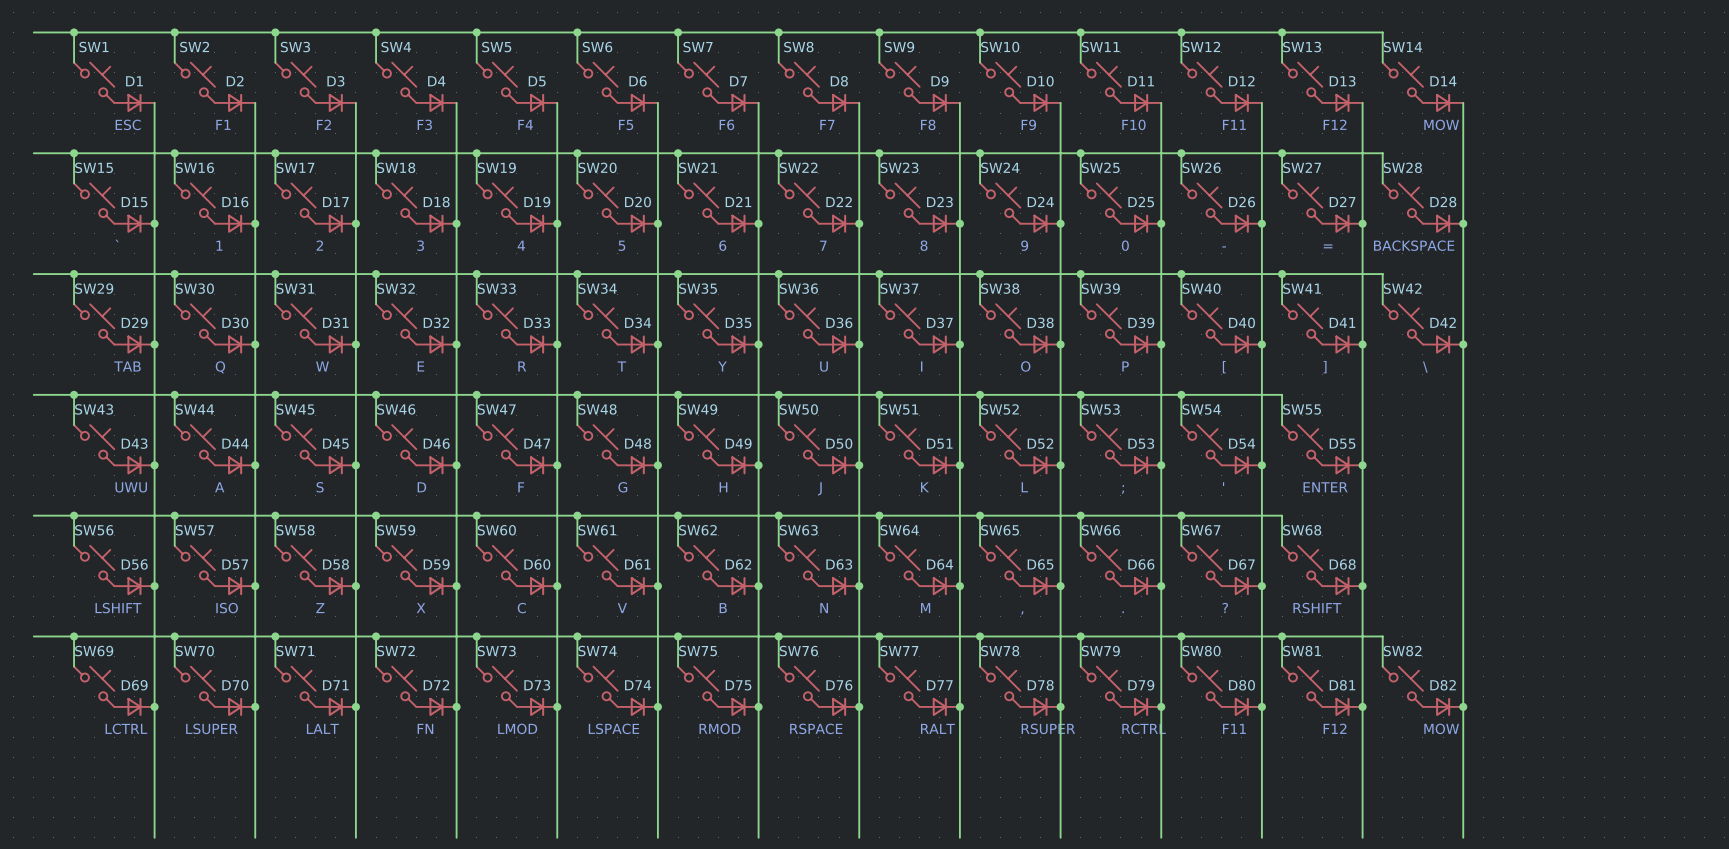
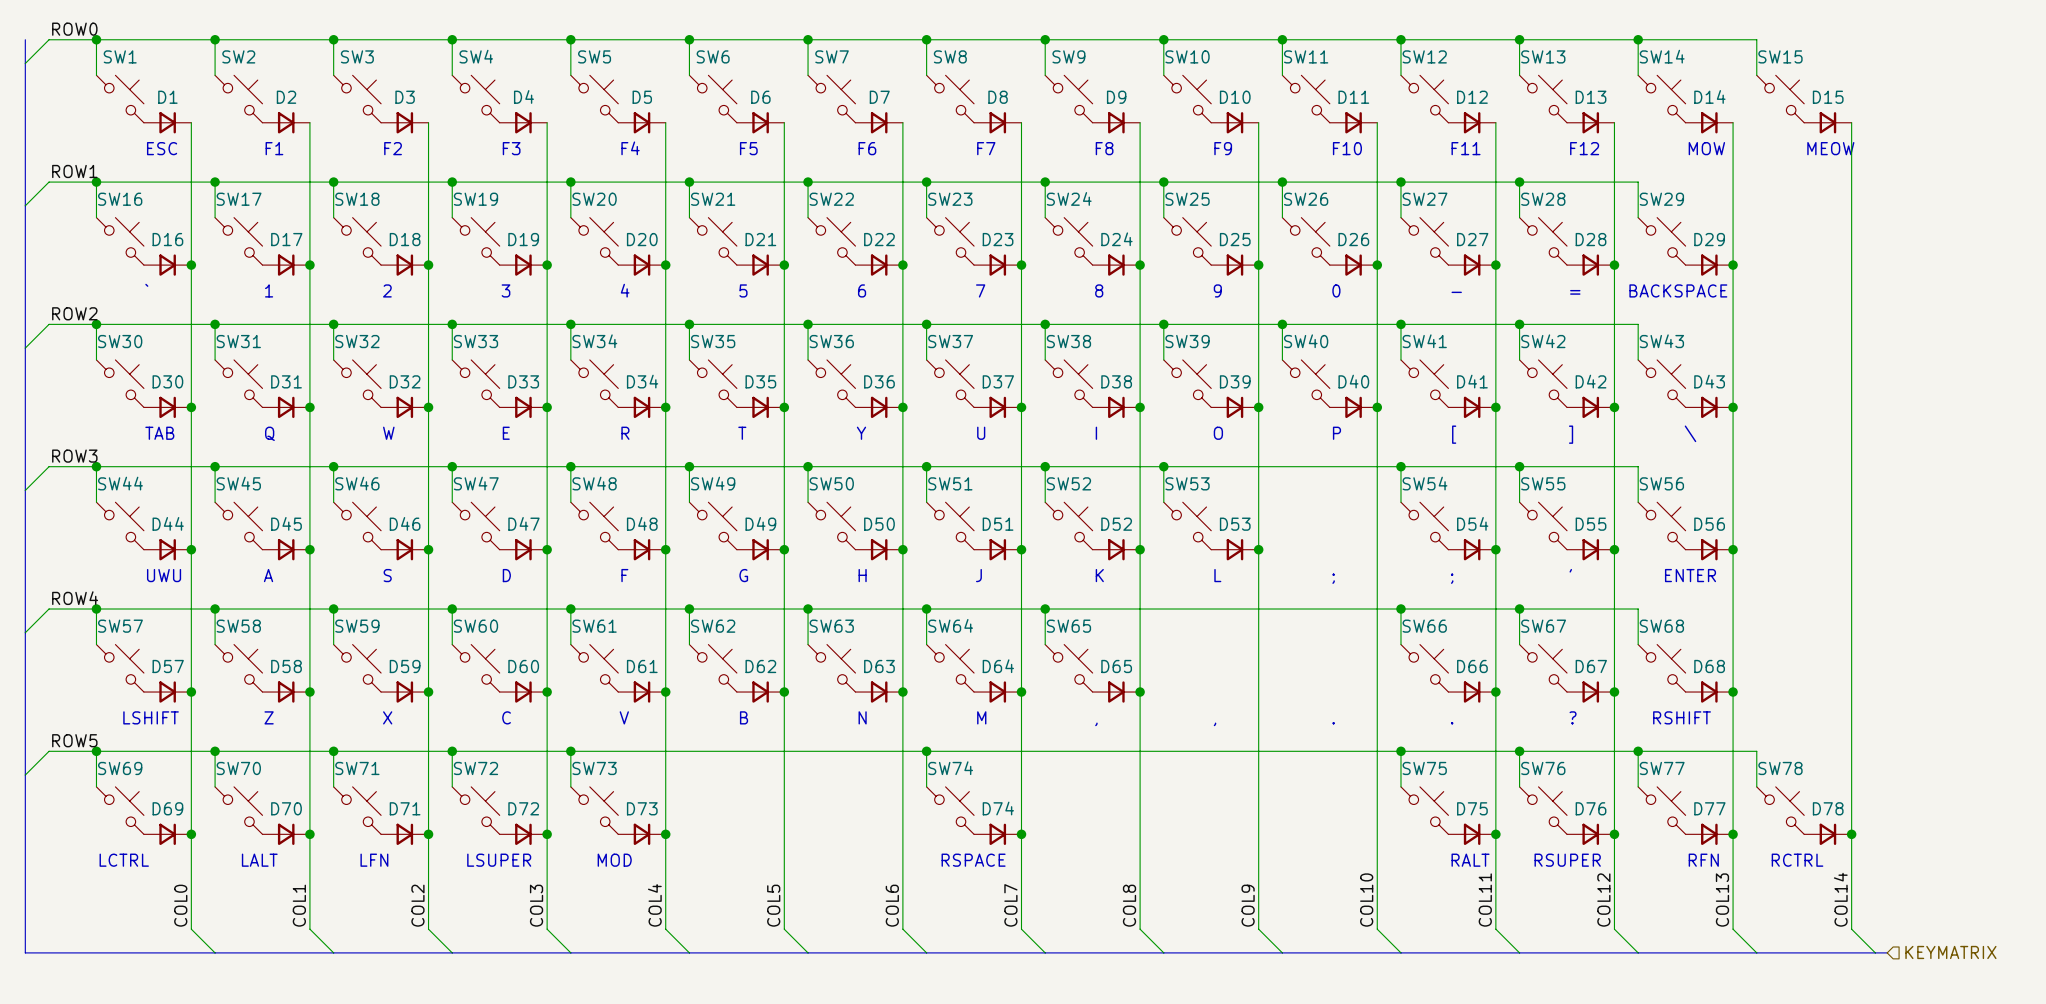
label: none -> ROW0 (74, 29)
bus: none -> (25, 39) (25, 952) (1887, 952)
wire: none -> (49, 39) (25, 63)
wire: none -> (1638, 39) (1756, 39) (1756, 75)
junction: none -> (1638, 39)
SW15: none -> (1780, 99)
D15: none -> (1827, 122)
wire: none -> (1851, 122) (1851, 929) (1875, 952)
text: none -> MEOW (1830, 148)
label: none -> ROW1 (74, 171)
wire: none -> (49, 182) (25, 205)
SW15 name: SW15 (94, 167) -> SW16 (120, 199)
SW16 name: SW16 (194, 167) -> SW17 (239, 199)
SW17 name: SW17 (295, 167) -> SW18 (357, 199)
SW18 name: SW18 (396, 167) -> SW19 (475, 199)
SW19 name: SW19 (496, 167) -> SW20 (594, 199)
SW20 name: SW20 (597, 167) -> SW21 (713, 199)
SW21 name: SW21 (698, 167) -> SW22 (831, 199)
SW22 name: SW22 (798, 167) -> SW23 (950, 199)
SW23 name: SW23 (899, 167) -> SW24 (1069, 198)
SW24 name: SW24 (1000, 167) -> SW25 (1187, 199)
SW25 name: SW25 (1100, 167) -> SW26 (1306, 199)
SW26 name: SW26 (1201, 167) -> SW27 (1424, 199)
SW27 name: SW27 (1302, 167) -> SW28 (1543, 199)
SW28 name: SW28 (1402, 167) -> SW29 (1661, 199)
D21 name: D21 (738, 201) -> D22 (879, 239)
D22 name: D22 (839, 201) -> D23 (998, 239)
D24 name: D24 (1040, 201) -> D25 (1235, 239)
D27 name: D27 (1342, 201) -> D28 (1591, 239)
D15 name: D15 (134, 202) -> D16 (167, 239)
D16 name: D16 (235, 202) -> D17 (286, 239)
D17 name: D17 (335, 202) -> D18 (405, 239)
D18 name: D18 (436, 202) -> D19 (523, 239)
D19 name: D19 (537, 202) -> D20 (642, 239)
D20 name: D20 (638, 202) -> D21 (760, 239)
D23 name: D23 (939, 202) -> D24 (1116, 239)
D25 name: D25 (1141, 202) -> D26 (1353, 239)
D26 name: D26 (1242, 202) -> D27 (1472, 239)
D28 name: D28 (1443, 202) -> D29 (1709, 239)
label: none -> ROW2 (74, 313)
wire: none -> (49, 324) (25, 348)
SW29 name: SW29 (94, 288) -> SW30 (120, 341)
SW30 name: SW30 (194, 288) -> SW31 (238, 341)
SW31 name: SW31 (295, 288) -> SW32 (357, 341)
SW32 name: SW32 (395, 288) -> SW33 (475, 341)
SW33 name: SW33 (496, 288) -> SW34 (594, 341)
SW34 name: SW34 (597, 288) -> SW35 (713, 341)
SW35 name: SW35 (698, 288) -> SW36 (831, 341)
SW36 name: SW36 (798, 288) -> SW37 (950, 341)
SW37 name: SW37 (899, 288) -> SW38 (1068, 341)
SW38 name: SW38 (1000, 288) -> SW39 (1187, 341)
SW39 name: SW39 (1100, 288) -> SW40 (1306, 341)
SW40 name: SW40 (1201, 288) -> SW41 (1424, 341)
SW41 name: SW41 (1302, 288) -> SW42 (1543, 341)
SW42 name: SW42 (1402, 288) -> SW43 (1661, 341)
D29 name: D29 (134, 322) -> D30 (167, 381)
D30 name: D30 (235, 322) -> D31 (286, 381)
D31 name: D31 (335, 322) -> D32 (405, 381)
D32 name: D32 (436, 322) -> D33 (523, 381)
D33 name: D33 (537, 322) -> D34 (642, 381)
D34 name: D34 (638, 322) -> D35 (760, 381)
D35 name: D35 (738, 322) -> D36 (879, 381)
D36 name: D36 (839, 322) -> D37 (998, 381)
D37 name: D37 (939, 322) -> D38 (1116, 381)
D38 name: D38 (1040, 322) -> D39 (1235, 381)
D39 name: D39 (1141, 322) -> D40 (1353, 381)
D40 name: D40 (1242, 322) -> D41 (1472, 381)
D41 name: D41 (1342, 322) -> D42 (1591, 381)
D42 name: D42 (1443, 322) -> D43 (1709, 381)
label: none -> ROW3 (74, 456)
wire: none -> (49, 466) (25, 490)
wire: (1080, 394) (1080, 425) -> none
junction: (1080, 394) -> none
wire: none -> (1519, 466) (1638, 466) (1638, 502)
junction: none -> (1519, 466)
SW43 name: SW43 (94, 409) -> SW44 (120, 483)
SW44 name: SW44 (194, 409) -> SW45 (238, 483)
SW45 name: SW45 (295, 409) -> SW46 (357, 483)
SW46 name: SW46 (396, 409) -> SW47 (476, 483)
SW47 name: SW47 (496, 409) -> SW48 (594, 483)
SW48 name: SW48 (597, 409) -> SW49 (713, 483)
SW49 name: SW49 (698, 409) -> SW50 (831, 483)
SW50 name: SW50 (798, 409) -> SW51 (950, 483)
SW51 name: SW51 (899, 409) -> SW52 (1068, 483)
SW52 name: SW52 (999, 409) -> SW53 (1187, 483)
D43 name: D43 (134, 443) -> D44 (168, 523)
D44 name: D44 (235, 443) -> D45 (286, 523)
D45 name: D45 (335, 443) -> D46 (405, 523)
D46 name: D46 (436, 443) -> D47 (523, 523)
D47 name: D47 (537, 443) -> D48 (642, 523)
D48 name: D48 (637, 443) -> D49 (760, 523)
D49 name: D49 (738, 443) -> D50 (879, 524)
D50 name: D50 (839, 443) -> D51 (998, 524)
D51 name: D51 (939, 443) -> D52 (1116, 524)
D52 name: D52 (1040, 443) -> D53 (1235, 524)
SW53: (1100, 445) -> none
SW56: none -> (1661, 525)
D53: (1141, 465) -> none
junction: (1161, 465) -> none
D56: none -> (1709, 549)
junction: none -> (1733, 549)
text: ' (1223, 484) -> ; (1452, 578)
text: none -> ' (1570, 570)
text position: ENTER (1325, 487) -> ENTER (1690, 575)
label: none -> ROW4 (75, 598)
wire: none -> (49, 609) (25, 632)
wire: (980, 515) (980, 545) -> none
junction: (980, 515) -> none
wire: (1080, 515) (1080, 545) -> none
junction: (1080, 515) -> none
wire: none -> (1519, 609) (1638, 609) (1638, 644)
junction: none -> (1519, 609)
SW56 name: SW56 (94, 530) -> SW57 (120, 626)
SW57 name: SW57 (194, 530) -> SW58 (238, 626)
SW58 name: SW58 (295, 530) -> SW59 (357, 626)
SW59 name: SW59 (396, 530) -> SW60 (475, 626)
SW60 name: SW60 (496, 530) -> SW61 (594, 626)
SW61 name: SW61 (597, 530) -> SW62 (713, 626)
SW62 name: SW62 (697, 530) -> SW63 (831, 626)
SW63 name: SW63 (798, 530) -> SW64 (950, 625)
SW64 name: SW64 (899, 530) -> SW65 (1068, 626)
SW67 name: SW67 (1201, 530) -> SW66 (1424, 626)
SW68 name: SW68 (1302, 530) -> SW67 (1543, 626)
D56 name: D56 (134, 564) -> D57 (168, 666)
D57 name: D57 (235, 564) -> D58 (286, 666)
D58 name: D58 (335, 564) -> D59 (405, 666)
D59 name: D59 (436, 564) -> D60 (523, 666)
D60 name: D60 (537, 564) -> D61 (642, 666)
D61 name: D61 (637, 564) -> D62 (760, 666)
D62 name: D62 (738, 564) -> D63 (879, 666)
D63 name: D63 (839, 564) -> D64 (998, 666)
D64 name: D64 (940, 564) -> D65 (1116, 666)
D67 name: D67 (1241, 564) -> D66 (1472, 666)
D68 name: D68 (1342, 564) -> D67 (1591, 666)
SW65: (1000, 566) -> none
SW66: (1100, 566) -> none
SW68: none -> (1661, 668)
D65: (1040, 586) -> none
junction: (1060, 586) -> none
D66: (1141, 586) -> none
junction: (1161, 586) -> none
D68: none -> (1709, 692)
junction: none -> (1733, 692)
text: ? (1225, 607) -> . (1452, 723)
text: none -> ? (1573, 717)
text: ISO (227, 608) -> Z (269, 717)
text: Z (320, 608) -> X (387, 717)
text: X (421, 608) -> C (506, 717)
text: C (521, 608) -> V (624, 717)
text: V (622, 608) -> B (744, 717)
text: B (723, 608) -> N (862, 717)
text: N (824, 608) -> M (981, 717)
text: M (925, 608) -> , (1096, 724)
text position: RSHIFT (1317, 608) -> RSHIFT (1682, 717)
label: none -> ROW5 (74, 740)
wire: none -> (49, 751) (25, 775)
wire: (577, 636) (577, 666) -> none
junction: (577, 636) -> none
wire: (678, 636) (678, 666) -> none
junction: (678, 636) -> none
wire: (879, 636) (879, 666) -> none
junction: (879, 636) -> none
wire: (980, 636) (980, 666) -> none
junction: (980, 636) -> none
wire: (1080, 636) (1080, 666) -> none
junction: (1080, 636) -> none
wire: none -> (1638, 751) (1756, 751) (1756, 786)
junction: none -> (1638, 751)
SW76 name: SW76 (798, 651) -> SW74 (950, 768)
SW80 name: SW80 (1201, 651) -> SW75 (1424, 768)
SW81 name: SW81 (1302, 651) -> SW76 (1543, 768)
SW82 name: SW82 (1402, 651) -> SW77 (1662, 768)
D76 name: D76 (839, 685) -> D74 (998, 808)
D80 name: D80 (1242, 685) -> D75 (1472, 808)
D81 name: D81 (1342, 685) -> D76 (1591, 808)
D82 name: D82 (1443, 685) -> D77 (1709, 808)
SW74: (597, 686) -> none
SW75: (698, 686) -> none
SW77: (899, 686) -> none
SW78 position: (1000, 686) -> (1780, 810)
SW79: (1100, 686) -> none
D74: (637, 706) -> none
junction: (657, 706) -> none
D75: (738, 706) -> none
junction: (758, 706) -> none
D77: (939, 706) -> none
junction: (959, 706) -> none
D78 position: (1040, 706) -> (1827, 834)
junction: (1060, 706) -> none
D79: (1141, 706) -> none
junction: (1161, 706) -> none
junction: none -> (1851, 834)
text position: LCTRL (126, 728) -> LCTRL (124, 860)
text: LSUPER (211, 728) -> none
text: none -> LFN (374, 860)
text position: LALT (322, 728) -> LALT (259, 860)
text: none -> LSUPER (499, 860)
text: FN (425, 728) -> none
text: LMOD (517, 728) -> MOD (614, 860)
text: LSPACE (613, 728) -> none
text: RMOD (719, 728) -> none
text: RALT (937, 728) -> none
text: RSUPER (1048, 728) -> none
text: RCTRL (1144, 728) -> none
text: F11 (1234, 728) -> RALT (1470, 860)
text: none -> RSUPER (1567, 860)
text: F12 (1335, 728) -> none
text: MOW (1441, 728) -> RFN (1703, 860)
text: none -> RCTRL (1797, 860)
label: none -> COL10 (1366, 900)
label: none -> COL11 (1485, 900)
label: none -> COL12 (1603, 900)
label: none -> COL13 (1722, 900)
label: none -> COL14 (1840, 899)
label: none -> COL4 (654, 905)
label: none -> COL0 (180, 905)
label: none -> COL1 (299, 905)
label: none -> COL2 (417, 905)
label: none -> COL3 (536, 905)
label: none -> COL5 (773, 905)
label: none -> COL6 (892, 905)
label: none -> COL7 (1010, 905)
label: none -> COL8 (1129, 905)
label: none -> COL9 (1248, 905)
wire: (154, 787) (154, 837) -> (191, 929) (215, 952)
wire: (255, 787) (255, 837) -> (309, 929) (333, 952)
wire: (355, 787) (355, 837) -> (428, 929) (452, 952)
wire: (456, 787) (456, 837) -> (547, 929) (570, 952)
wire: (557, 787) (557, 837) -> (665, 929) (689, 952)
wire: (657, 787) (657, 837) -> (784, 929) (808, 952)
wire: (758, 787) (758, 837) -> (902, 929) (926, 952)
wire: (859, 787) (859, 837) -> (1021, 929) (1045, 952)
wire: (959, 787) (959, 837) -> (1140, 929) (1163, 952)
wire: (1060, 787) (1060, 837) -> (1258, 929) (1282, 952)
wire: (1161, 787) (1161, 837) -> (1377, 929) (1400, 952)
wire: (1261, 787) (1261, 837) -> (1495, 929) (1519, 952)
wire: (1362, 787) (1362, 837) -> (1614, 929) (1638, 952)
wire: (1463, 787) (1463, 837) -> (1733, 929) (1756, 952)
hierarchical label: none -> KEYMATRIX (1950, 952)

